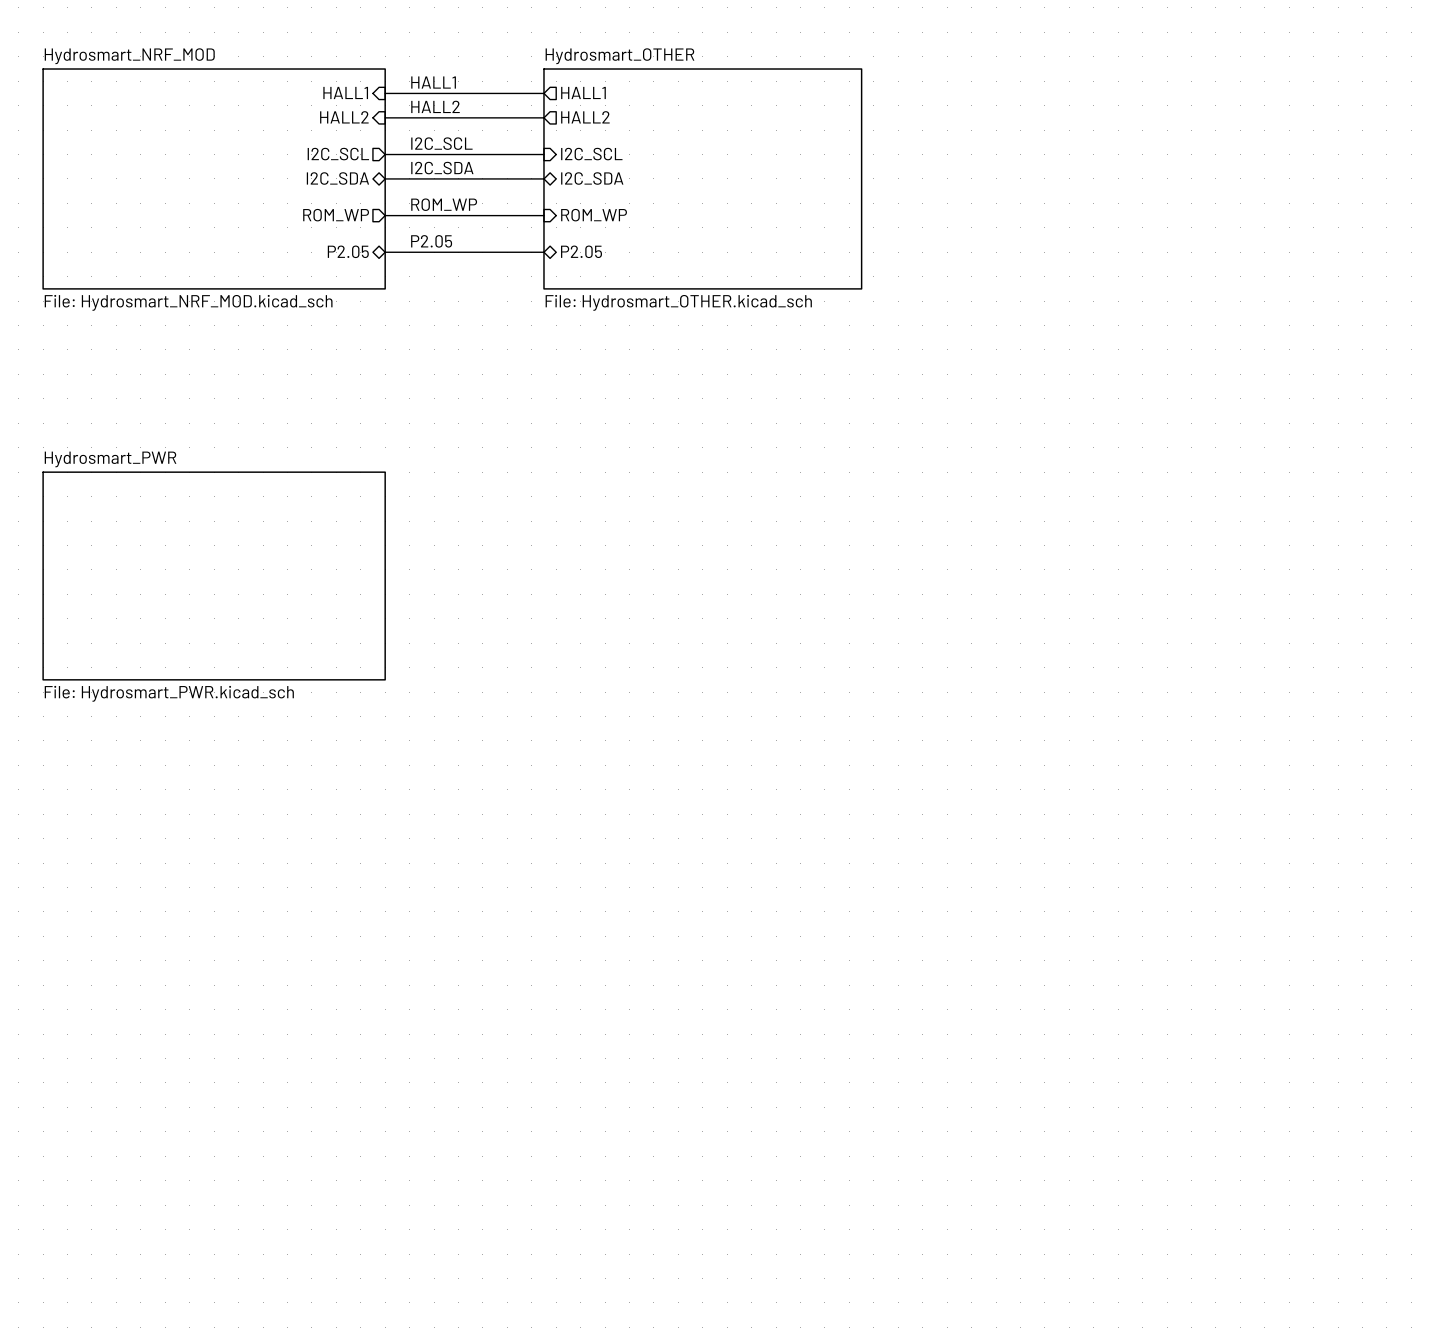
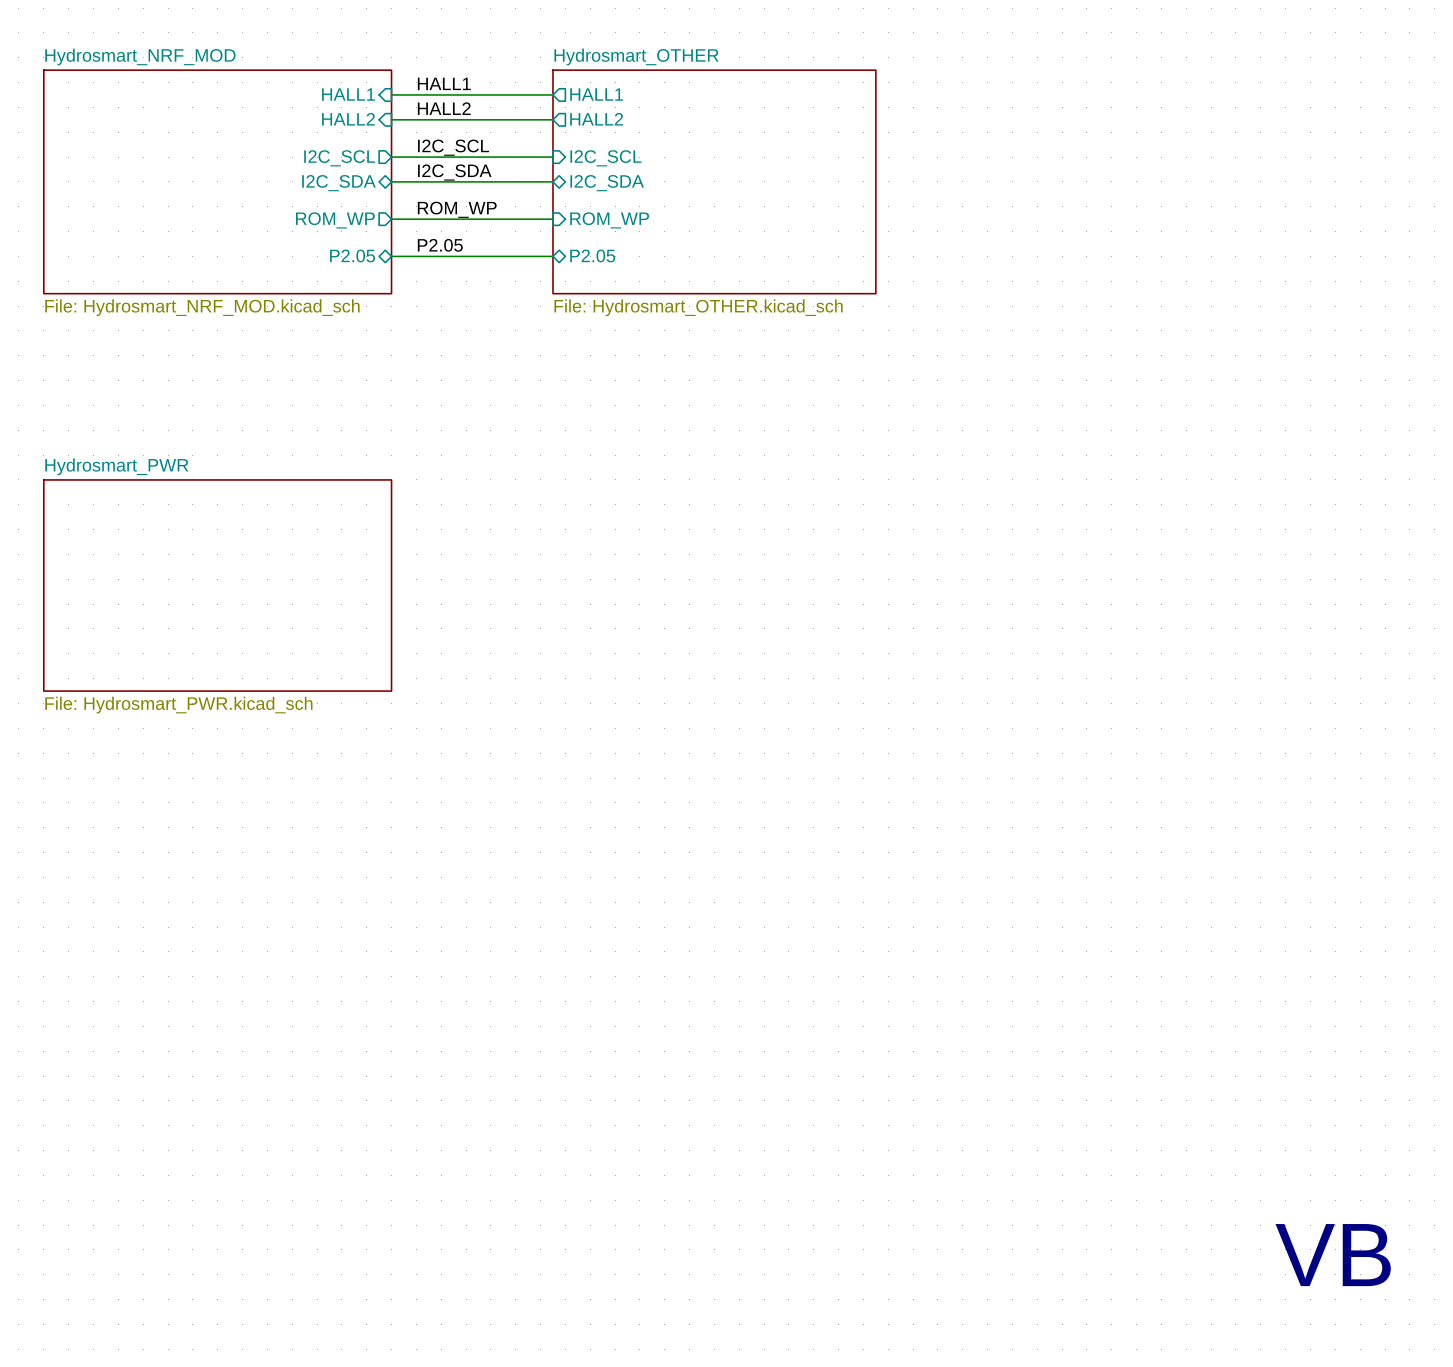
text: none -> VB (1333, 1255)

